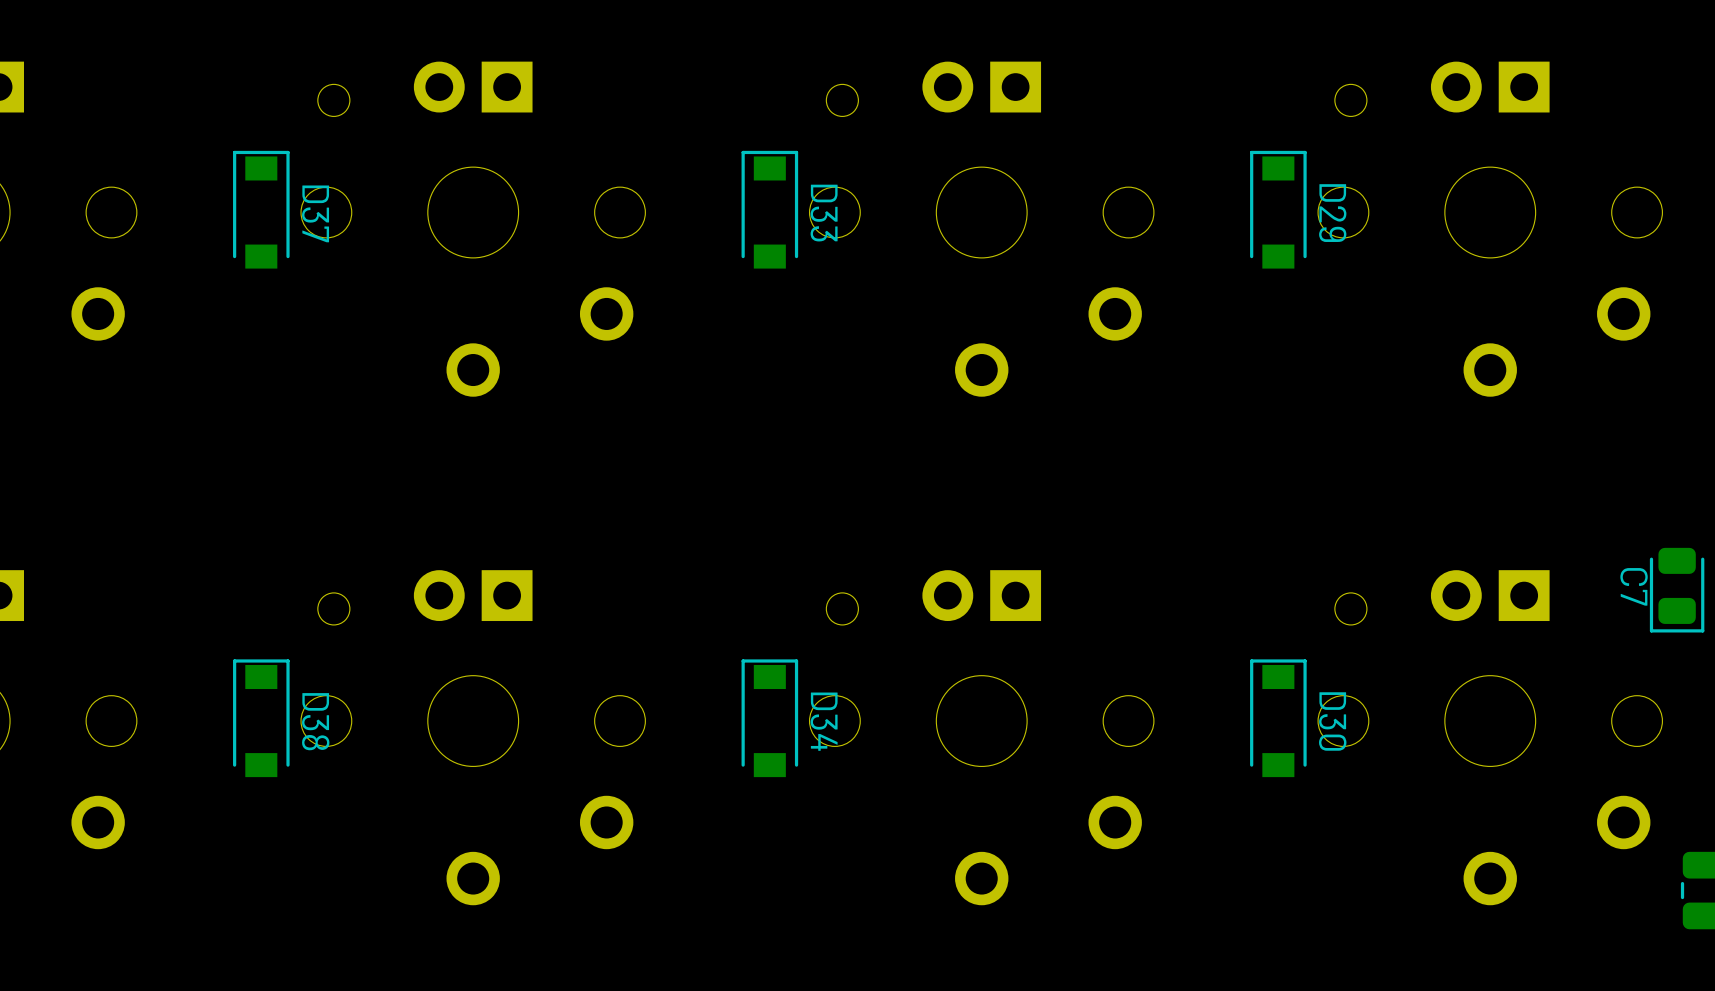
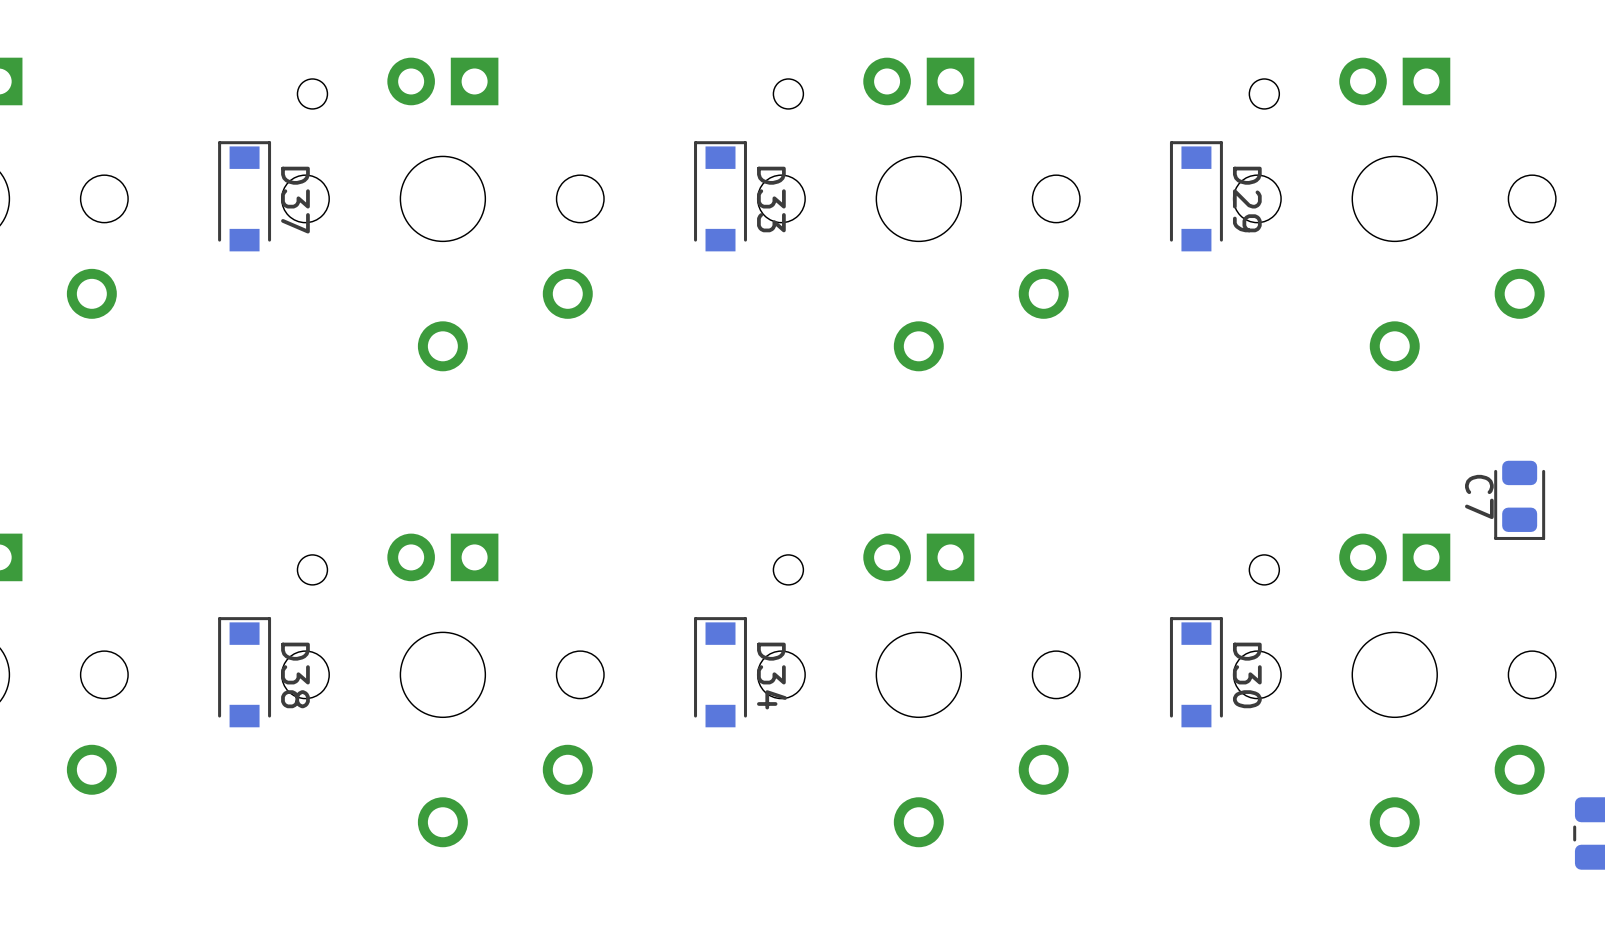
C7 position: (1677, 590) -> (1519, 500)

